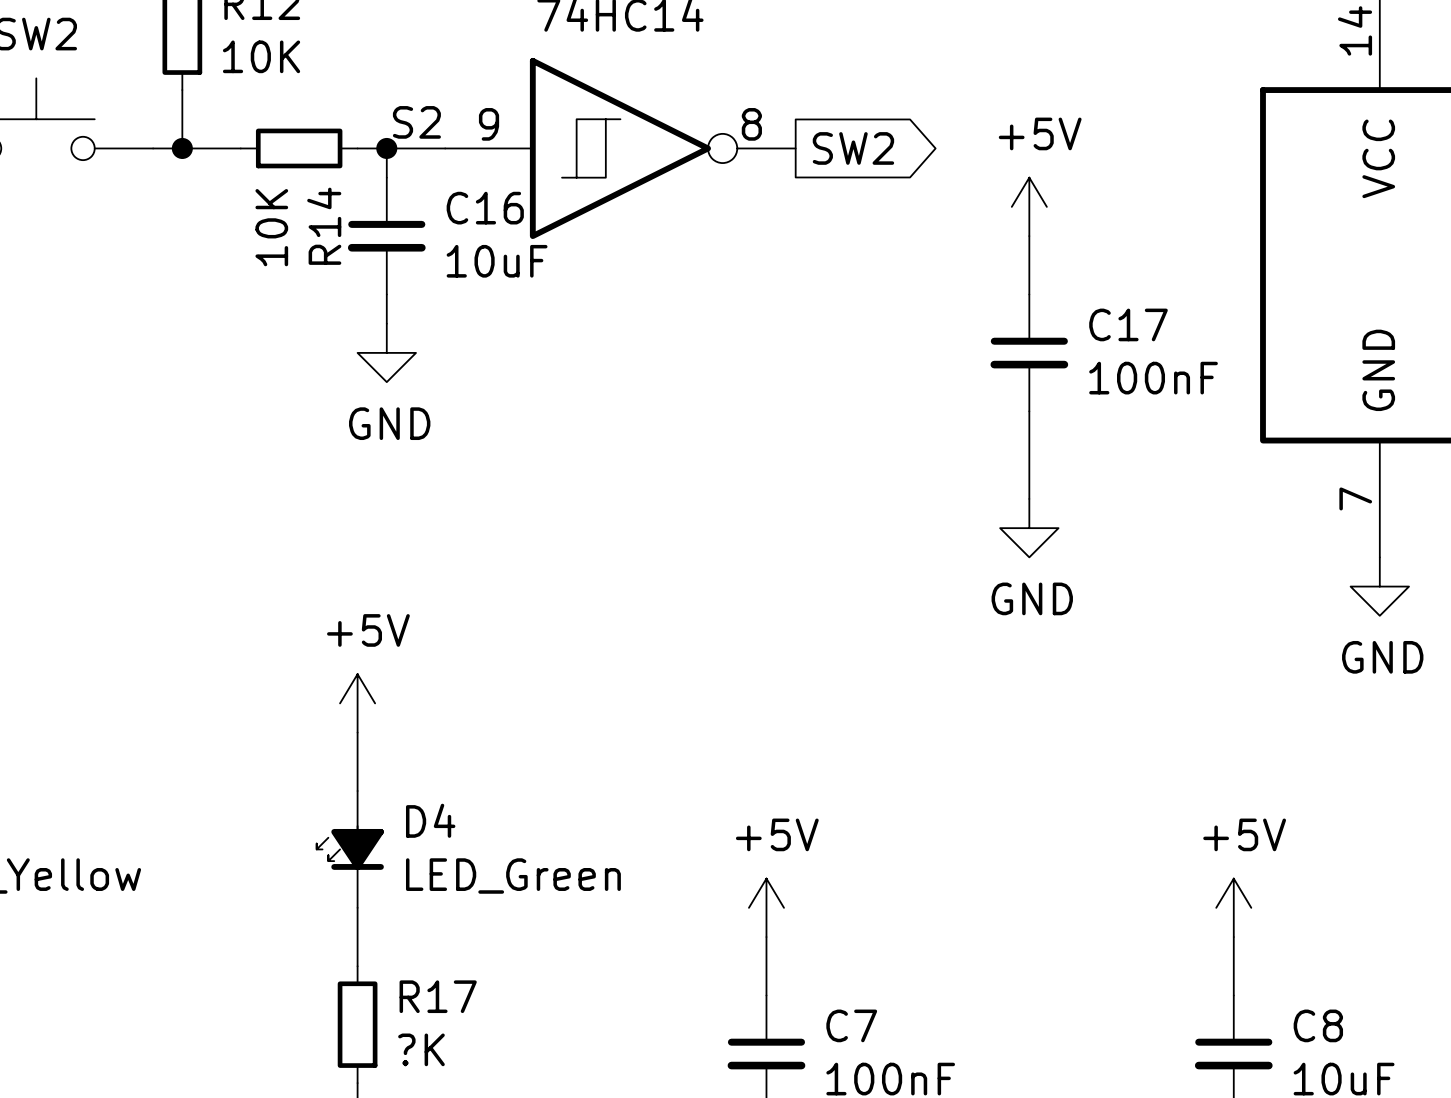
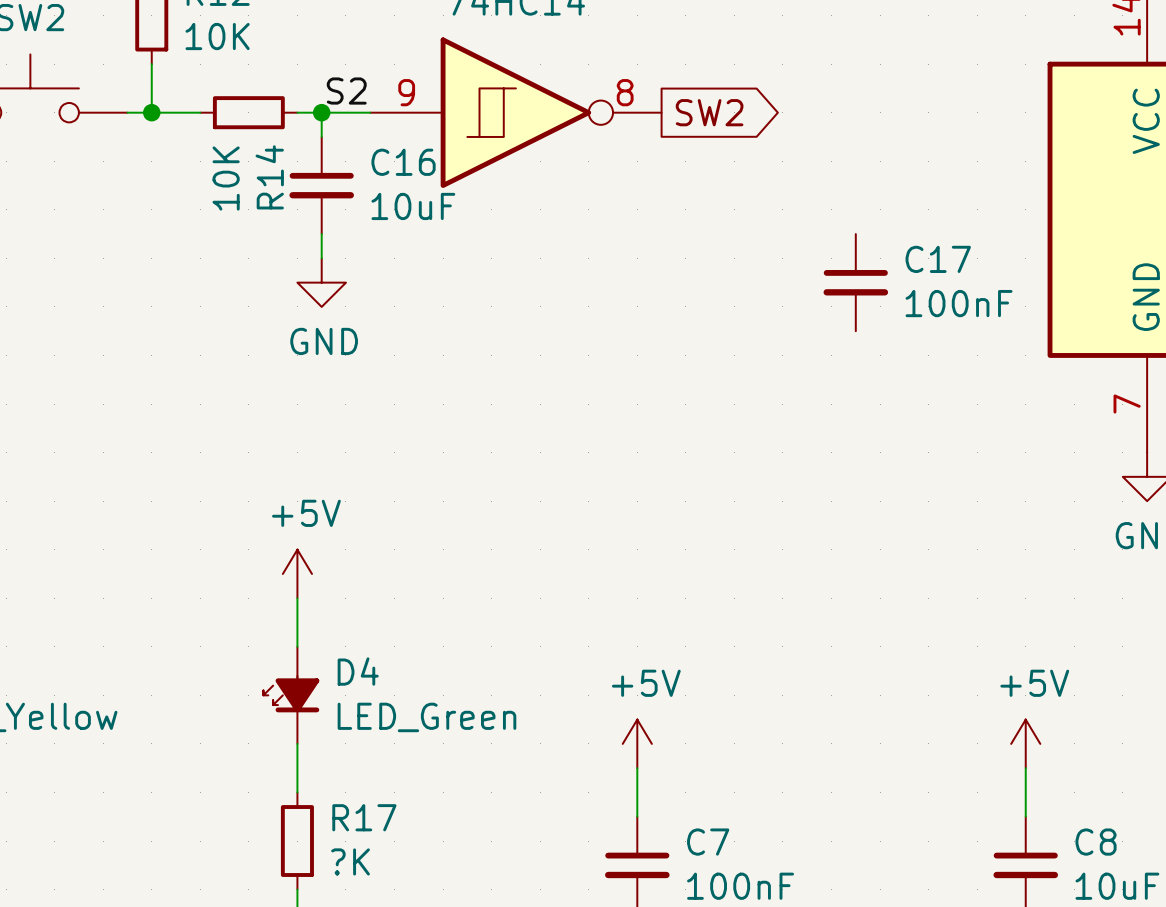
power symbol: +5V (1029, 206) -> none
wire: (1029, 236) (1029, 294) -> none
wire: (1029, 411) (1029, 498) -> none
power symbol: GND (1029, 528) -> none

